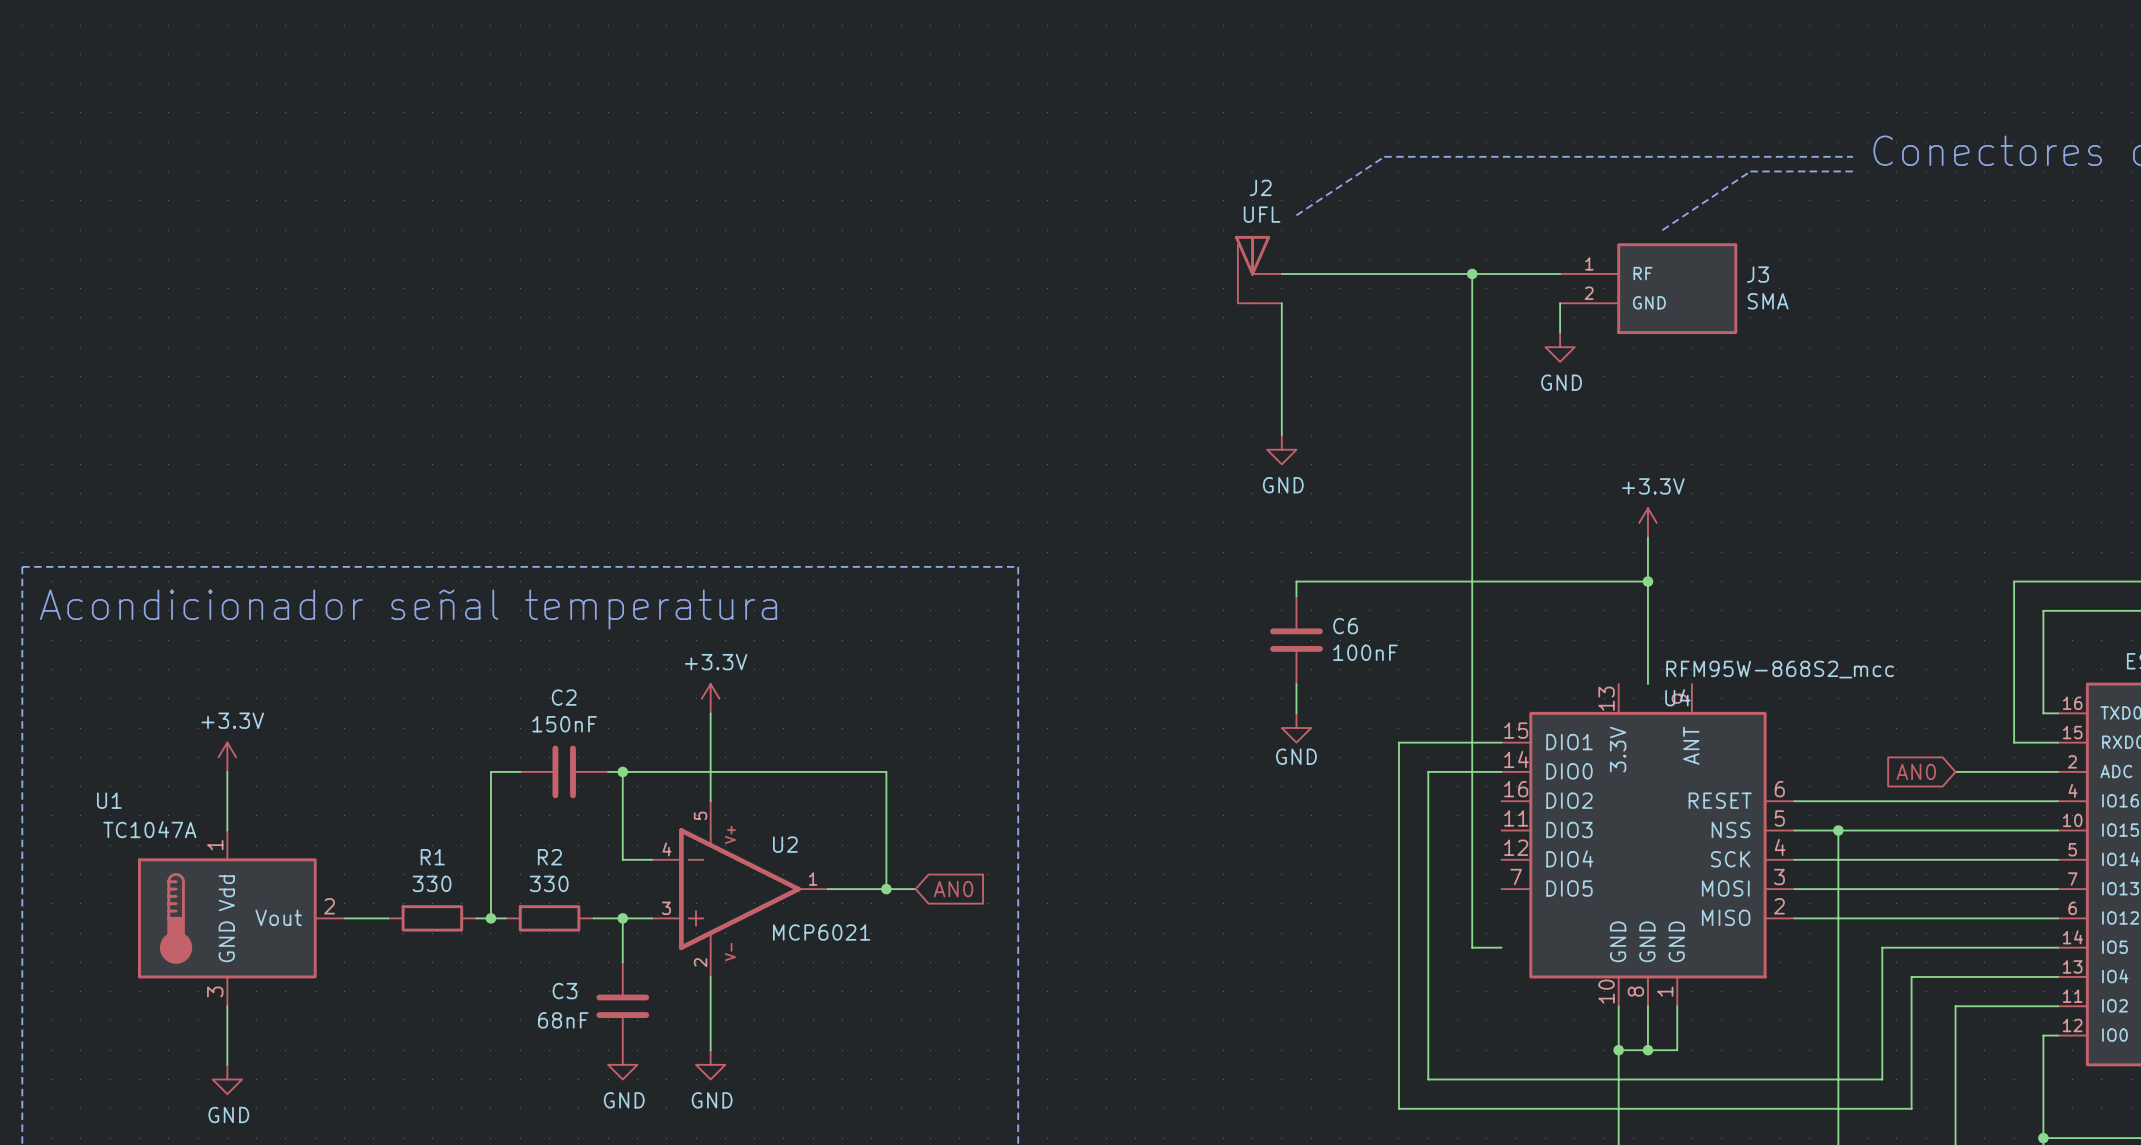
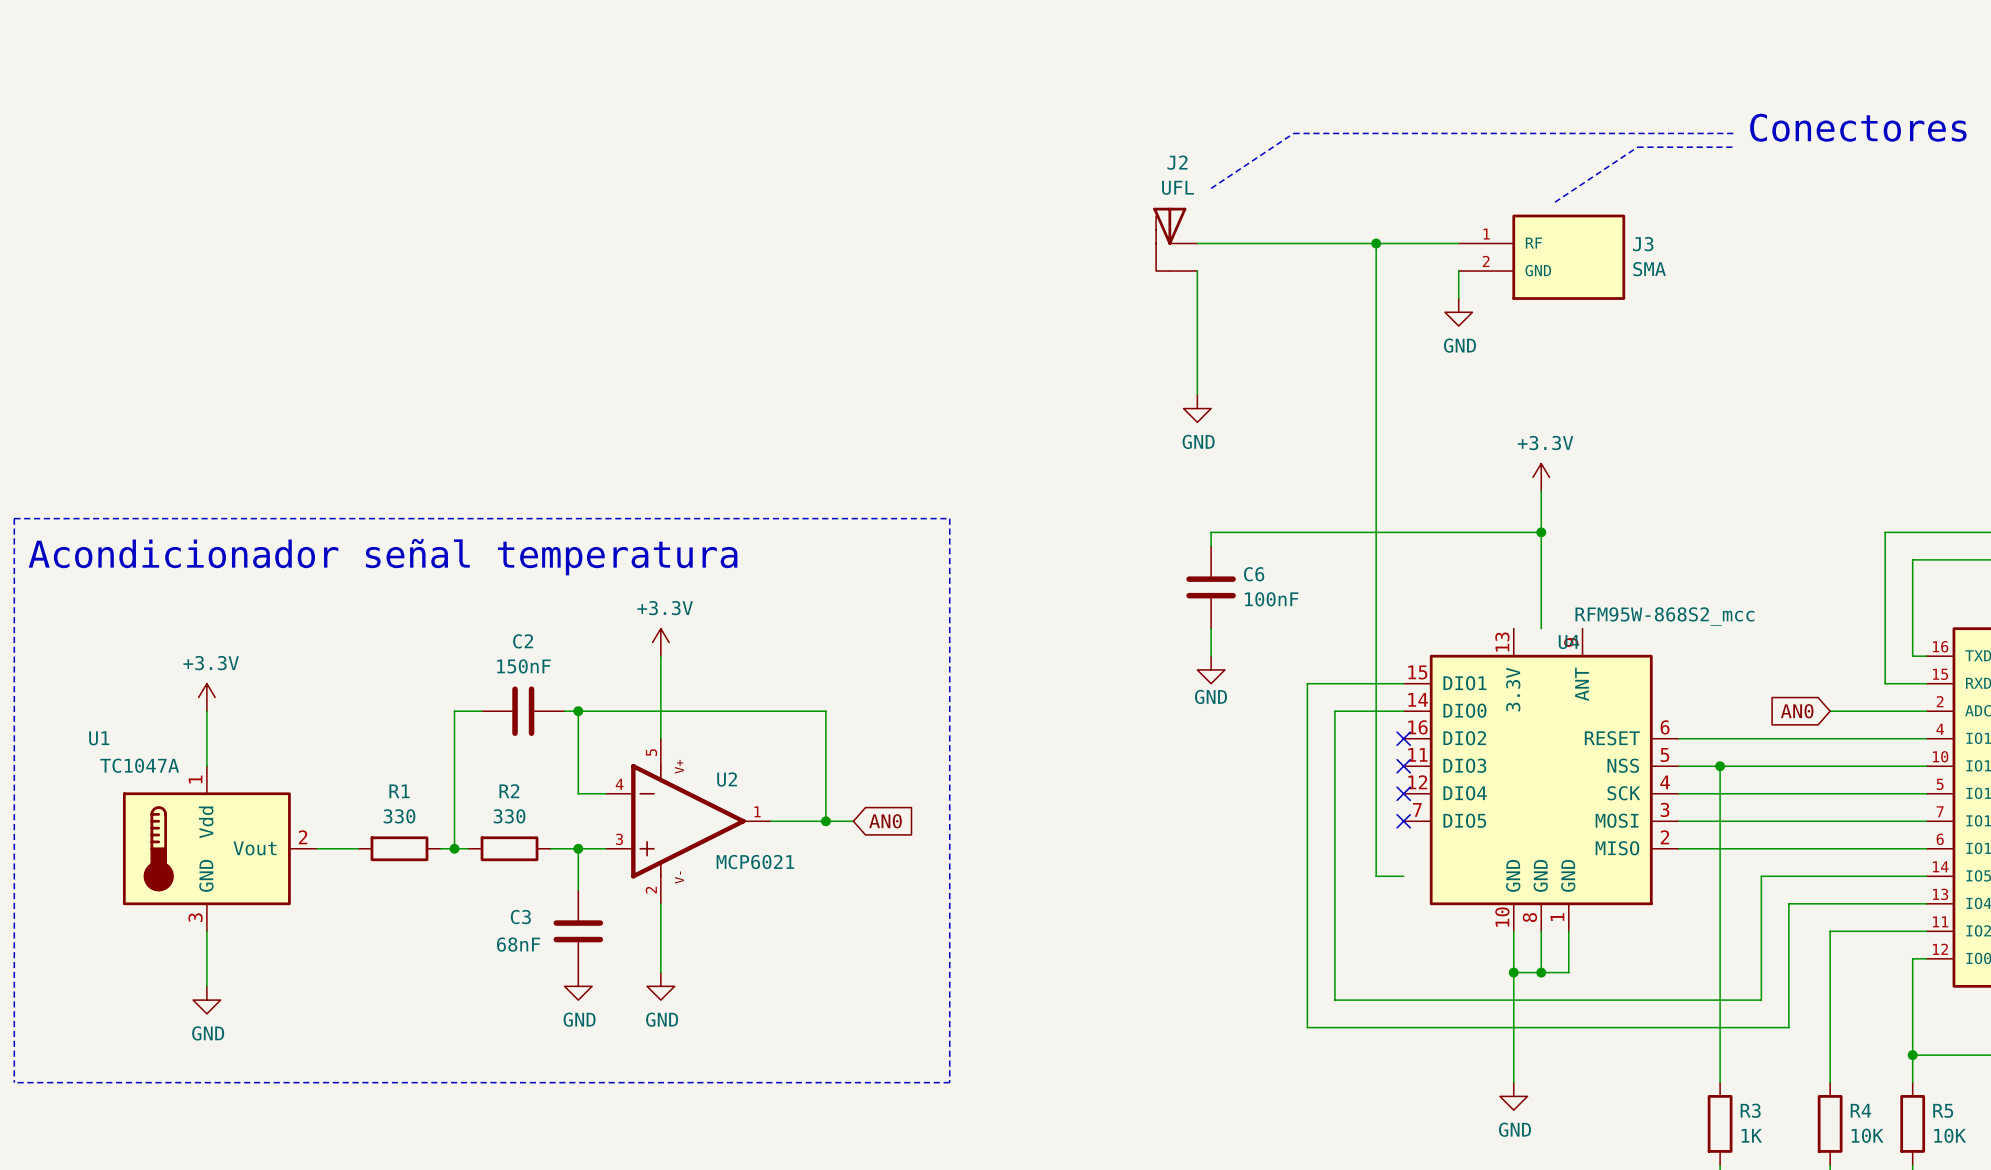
no-connect mark: none -> (1403, 738)
no-connect mark: none -> (1403, 766)
no-connect mark: none -> (1403, 793)
no-connect mark: none -> (1403, 821)

